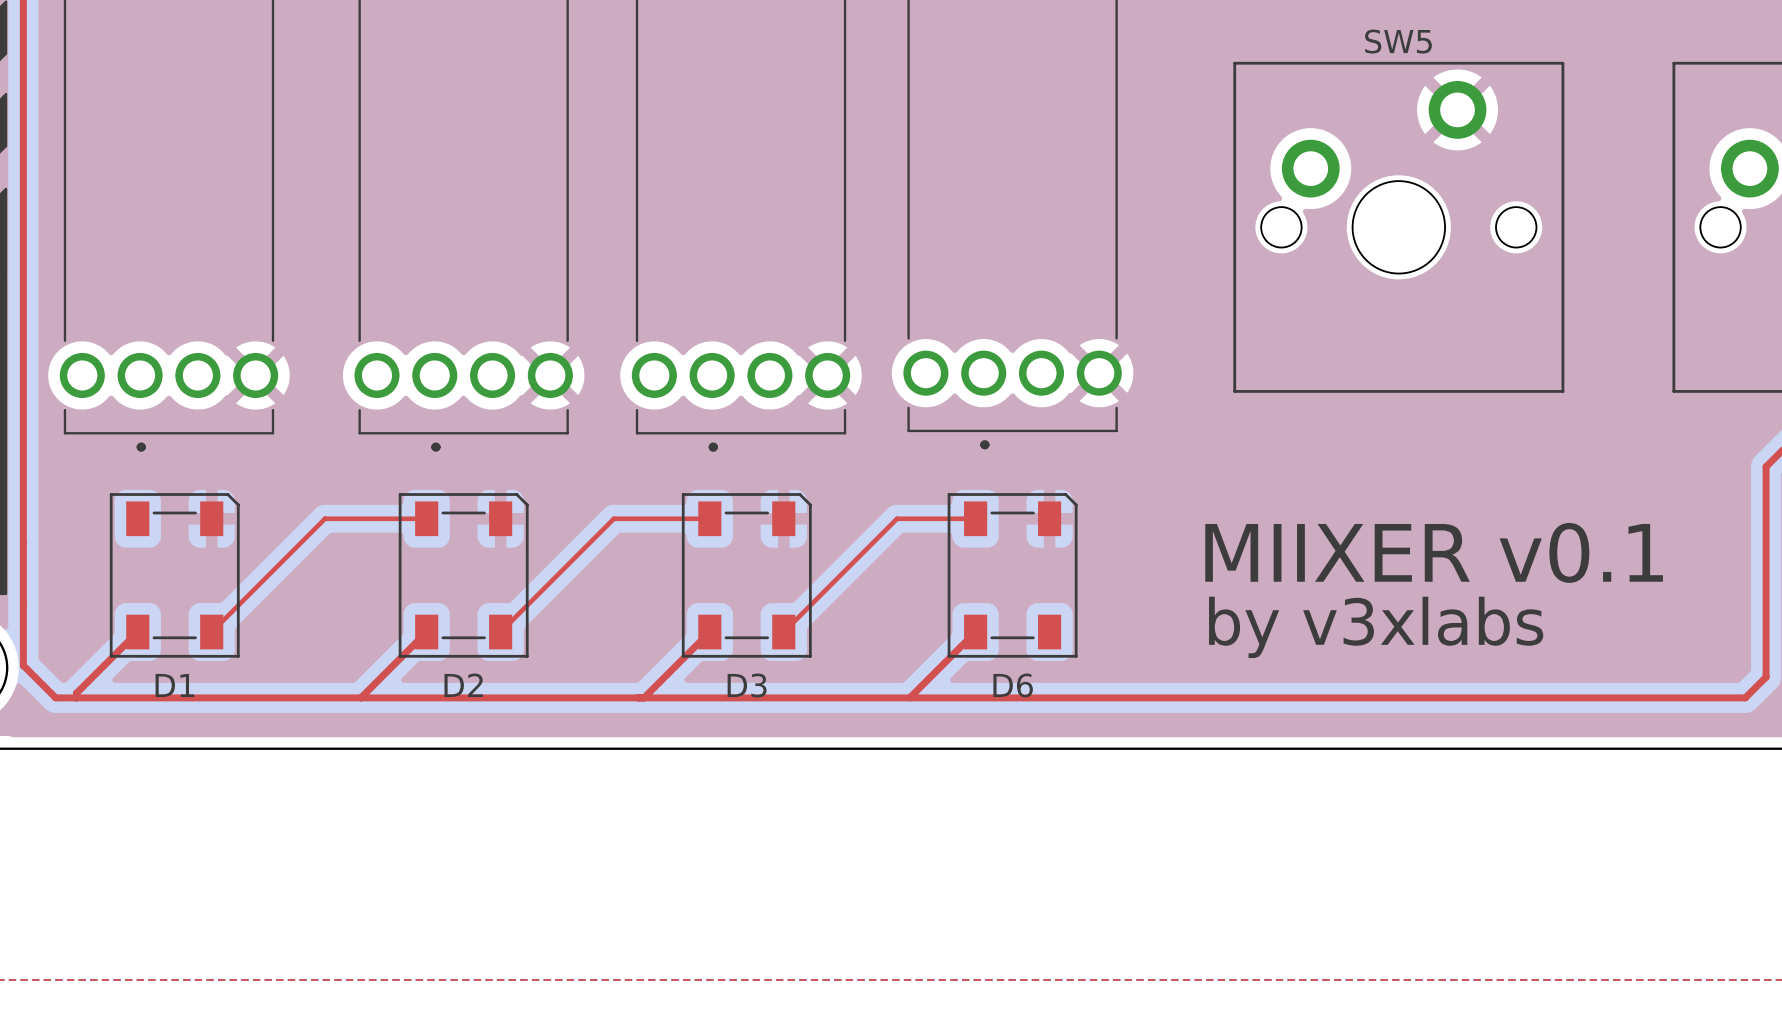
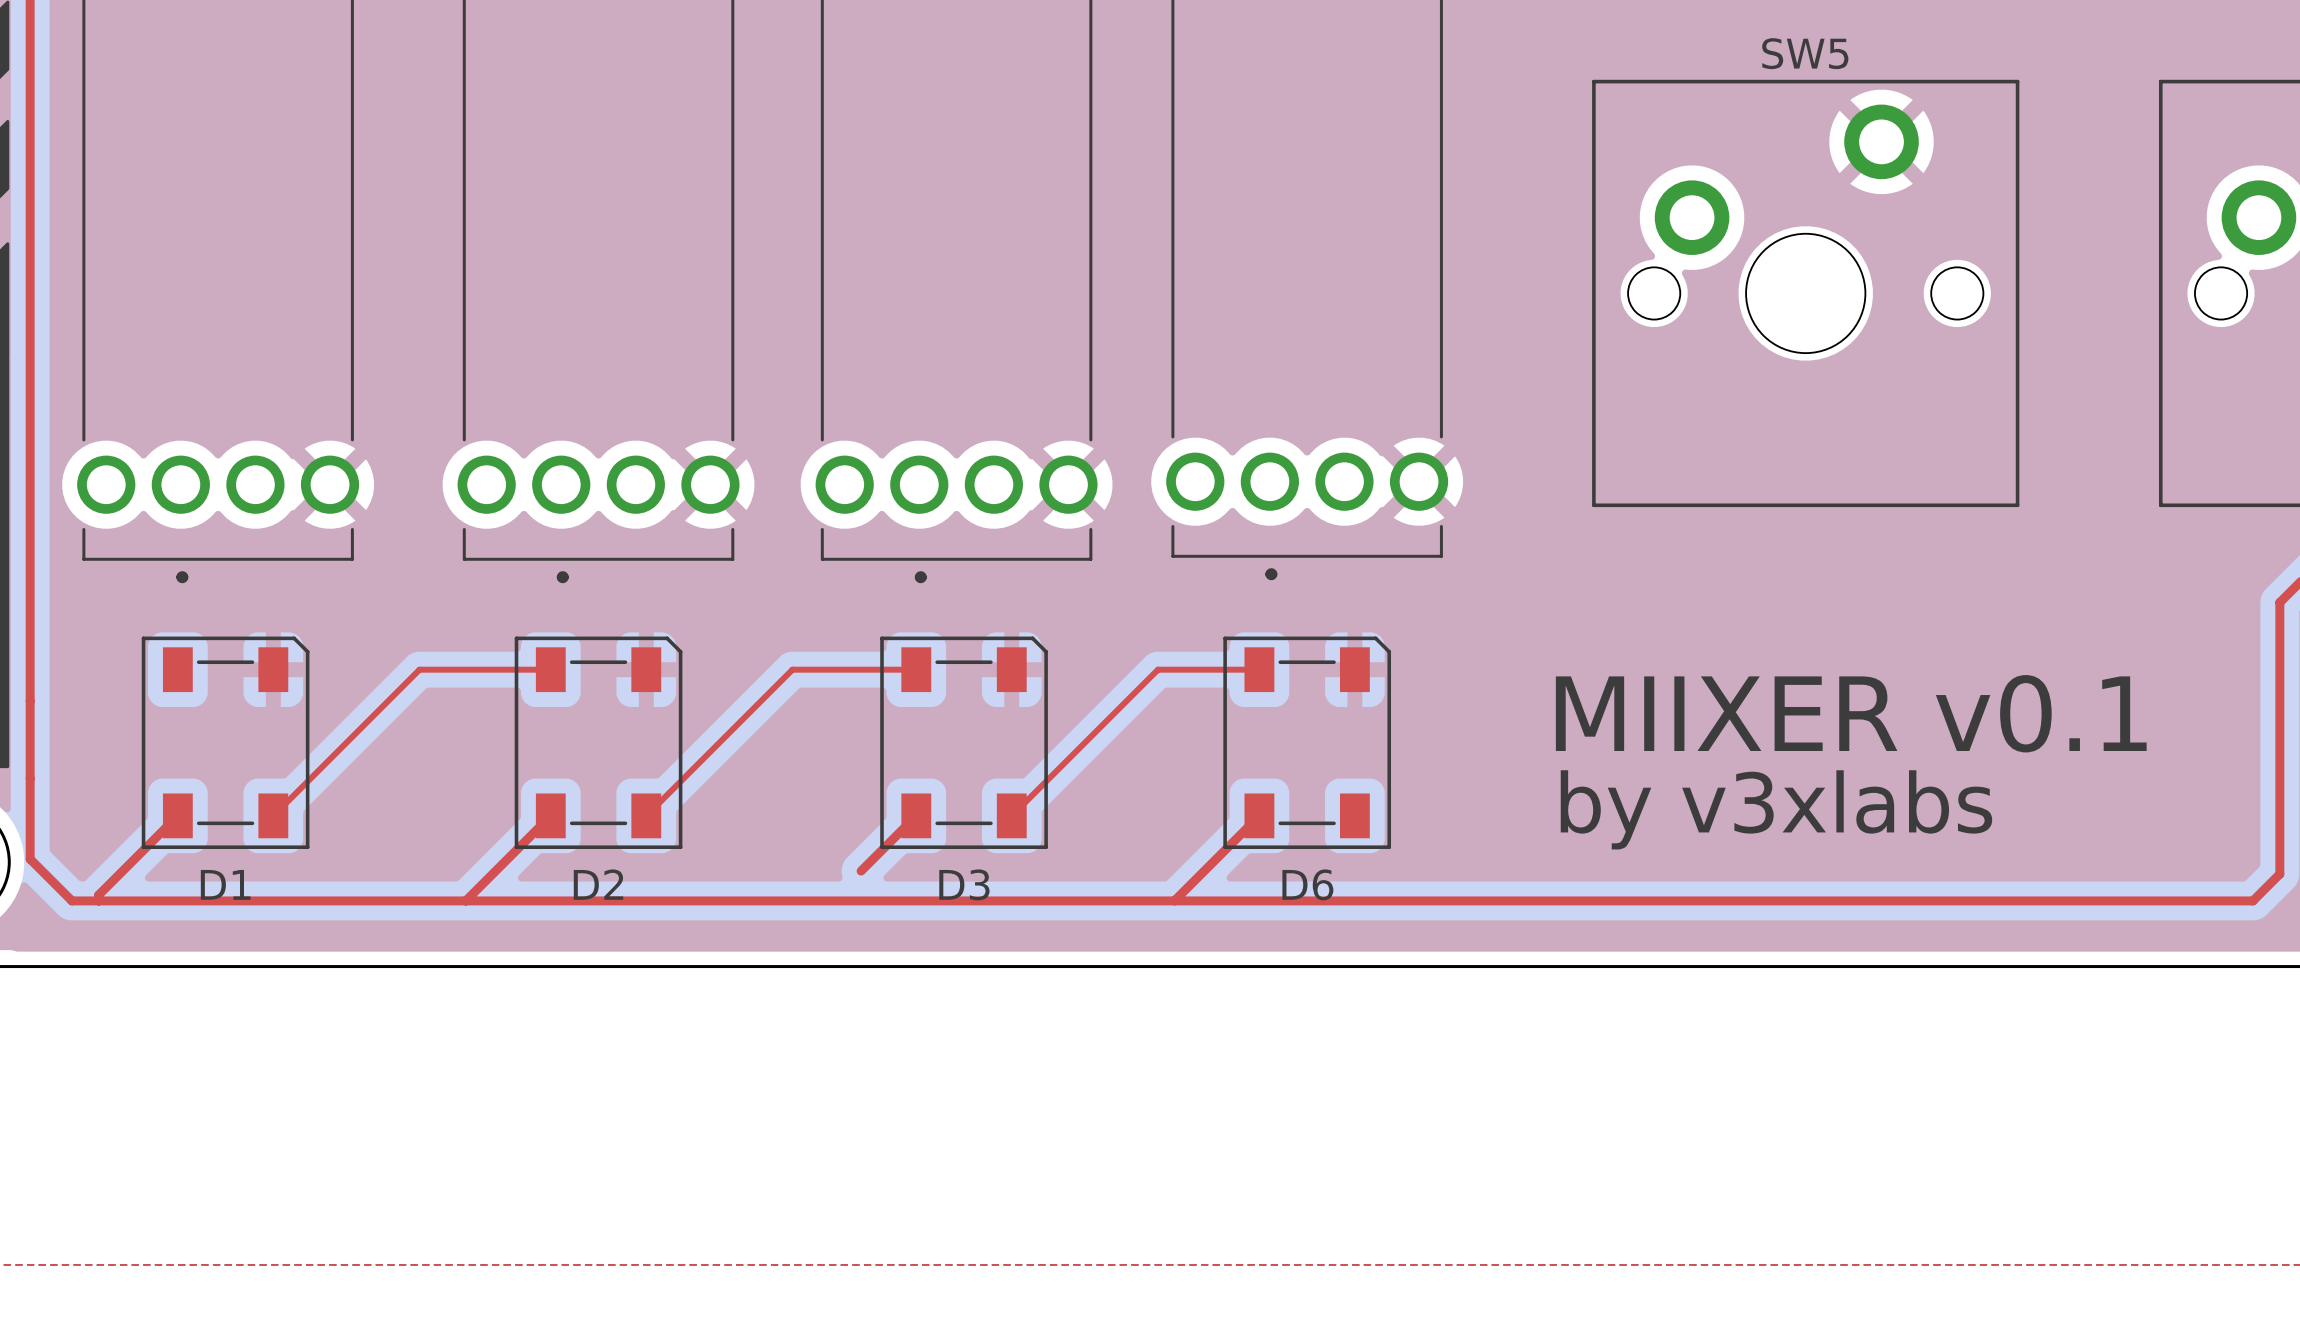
top track: (667, 674) (643, 697) -> none

